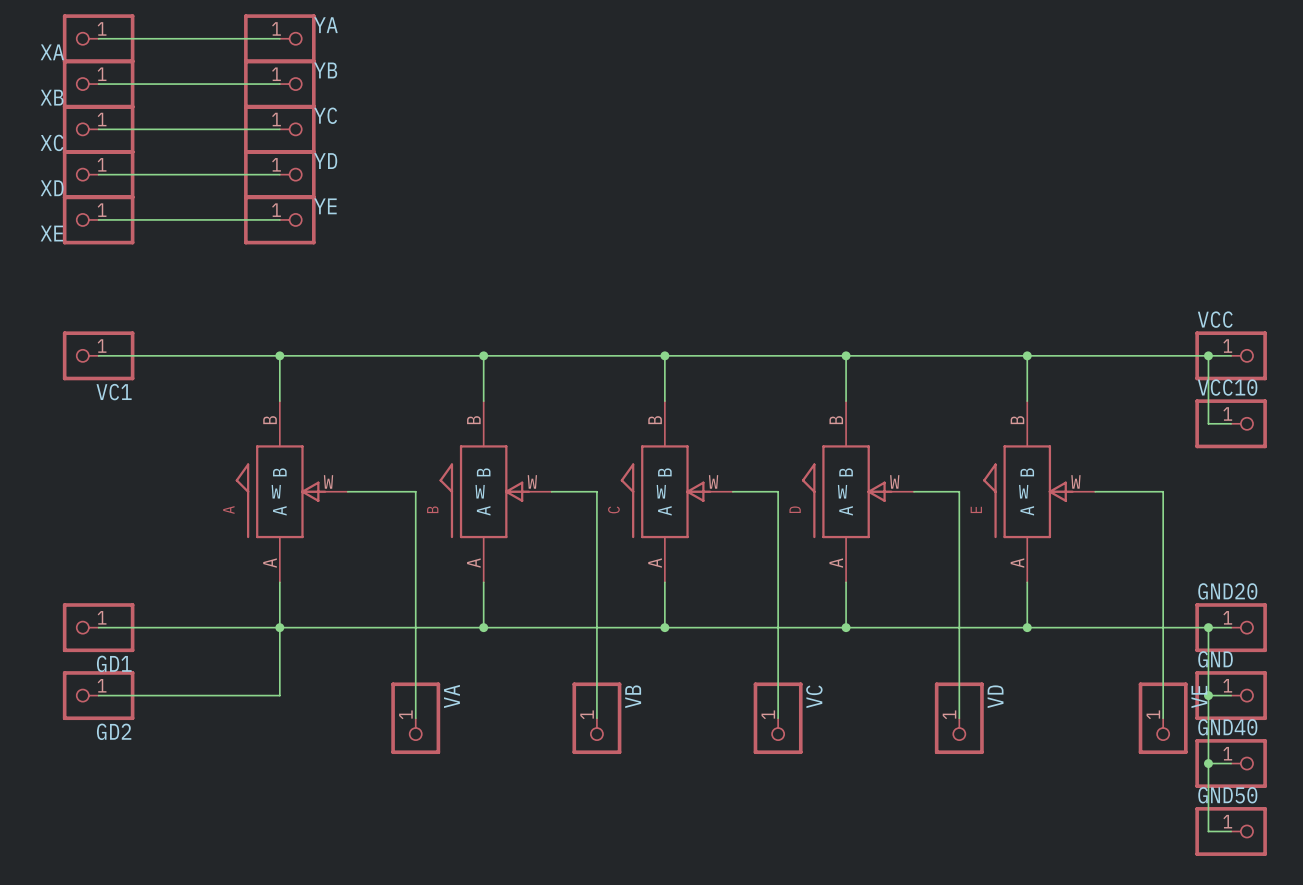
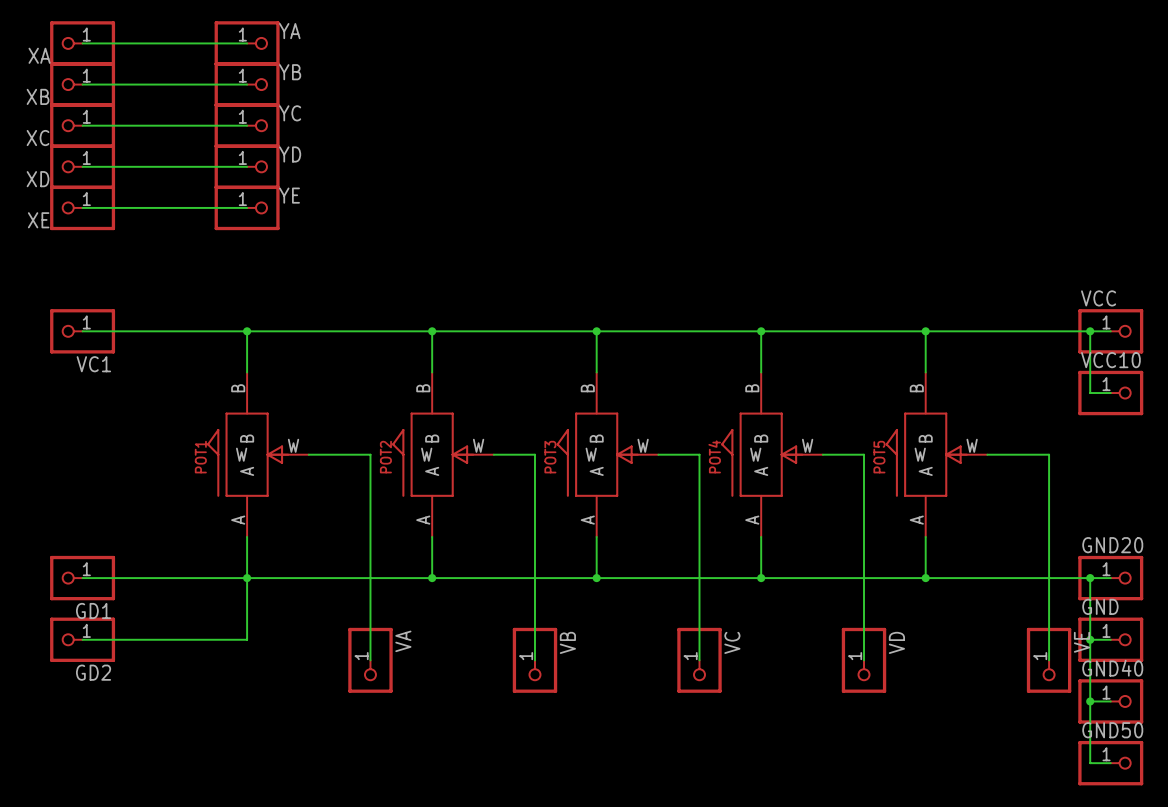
B name: B (432, 509) -> POT2 (385, 457)
C name: C (613, 509) -> POT3 (550, 457)
D name: D (795, 509) -> POT4 (714, 456)
E name: E (976, 509) -> POT5 (879, 457)
A name: A (228, 510) -> POT1 (200, 457)

